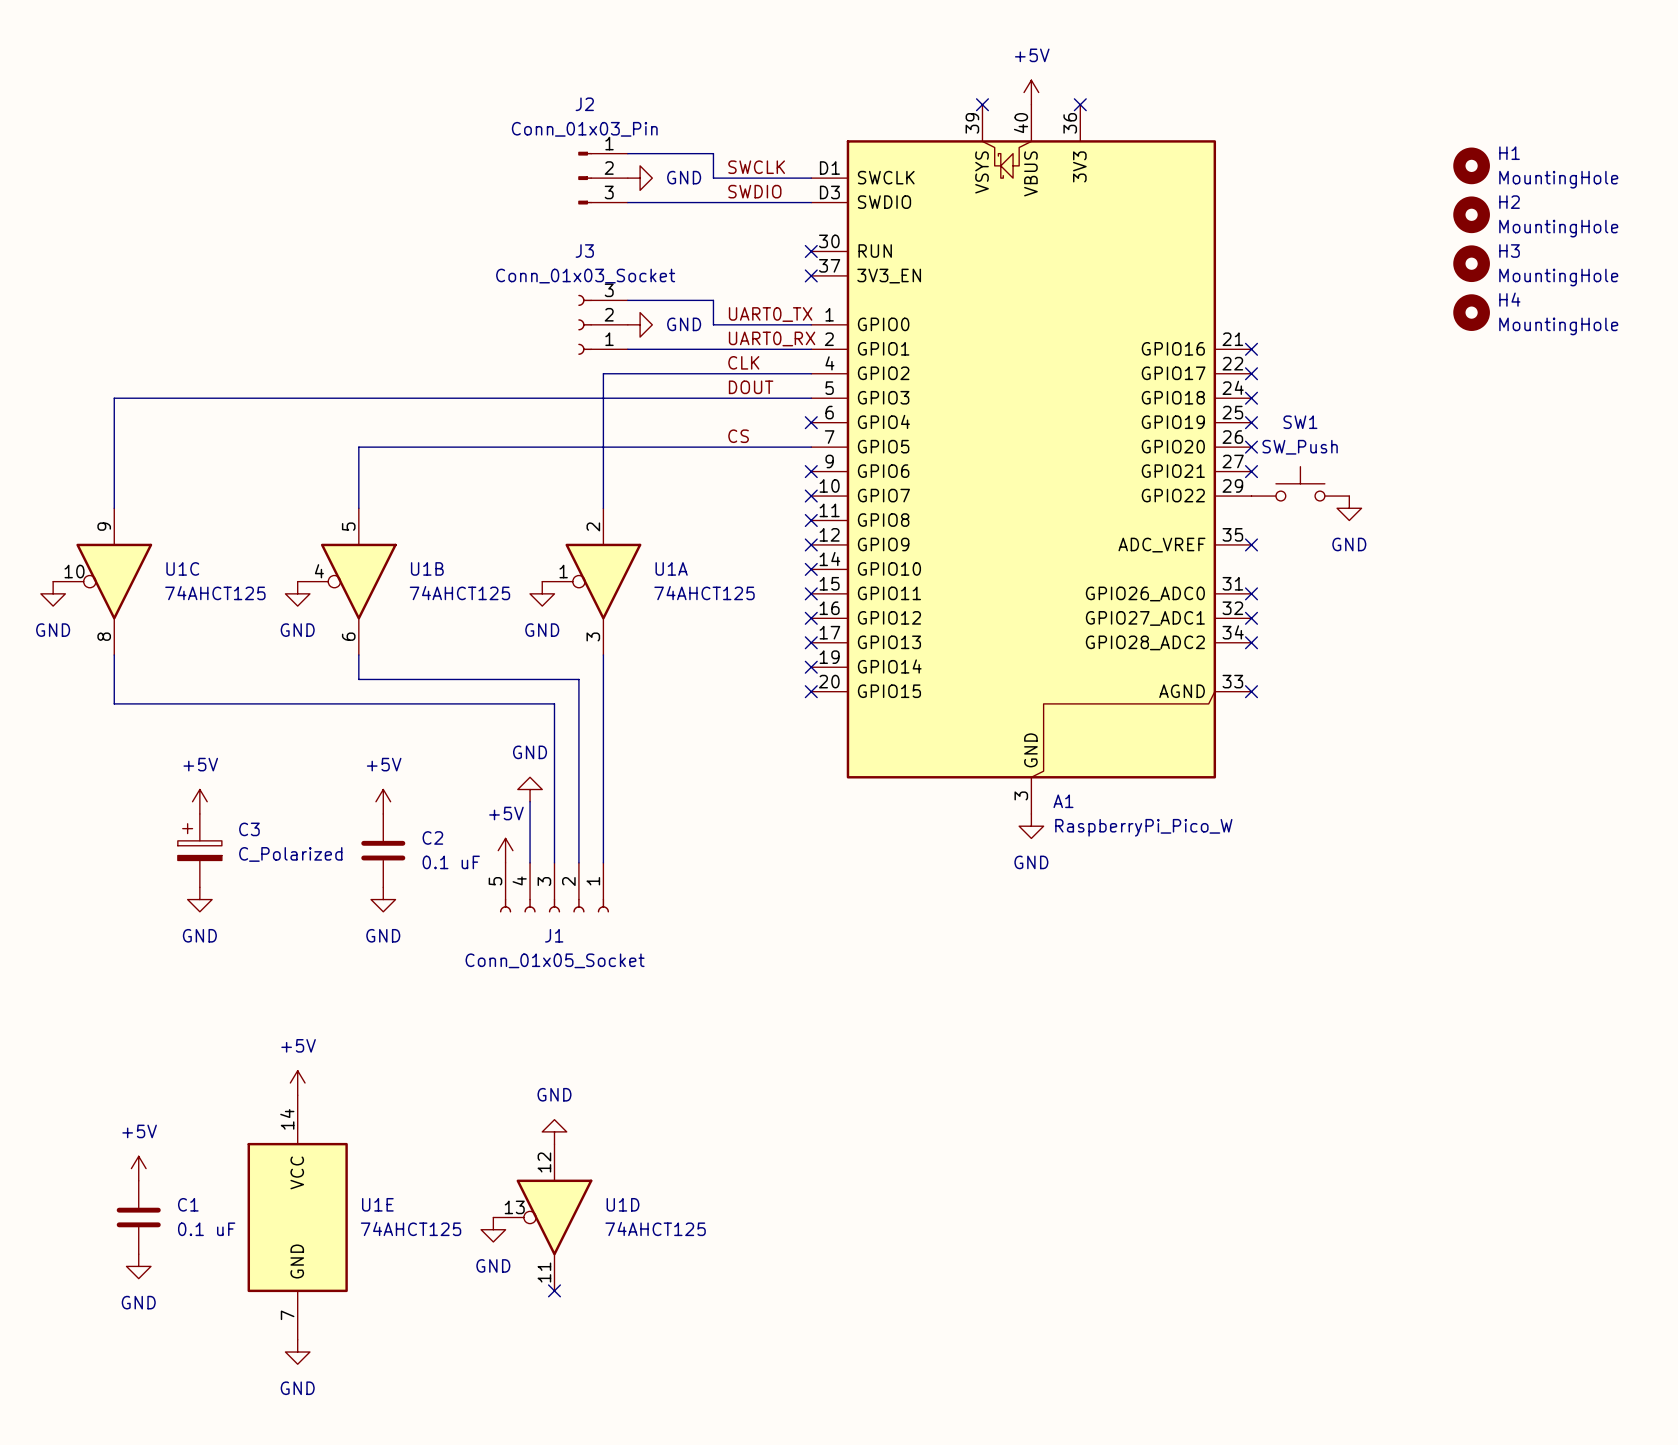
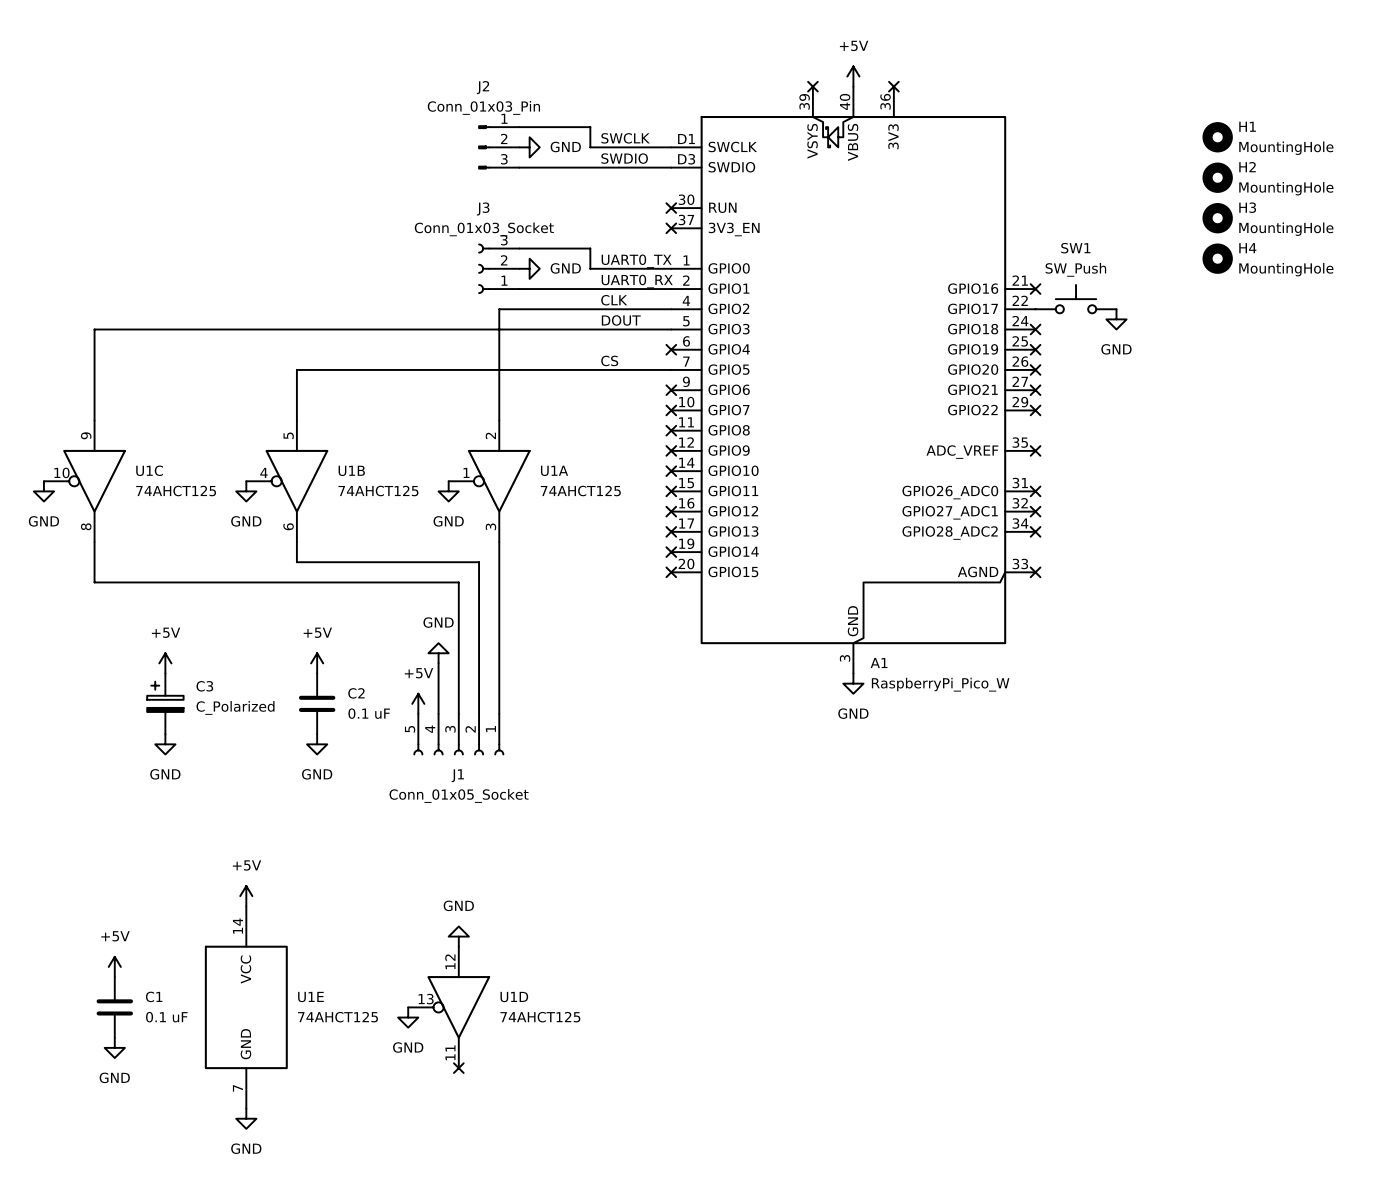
no-connect mark: (1251, 373) -> none
SW1 position: (1300, 483) -> (1076, 299)
no-connect mark: none -> (1035, 410)
power symbol position: GND (1349, 508) -> GND (1116, 319)

